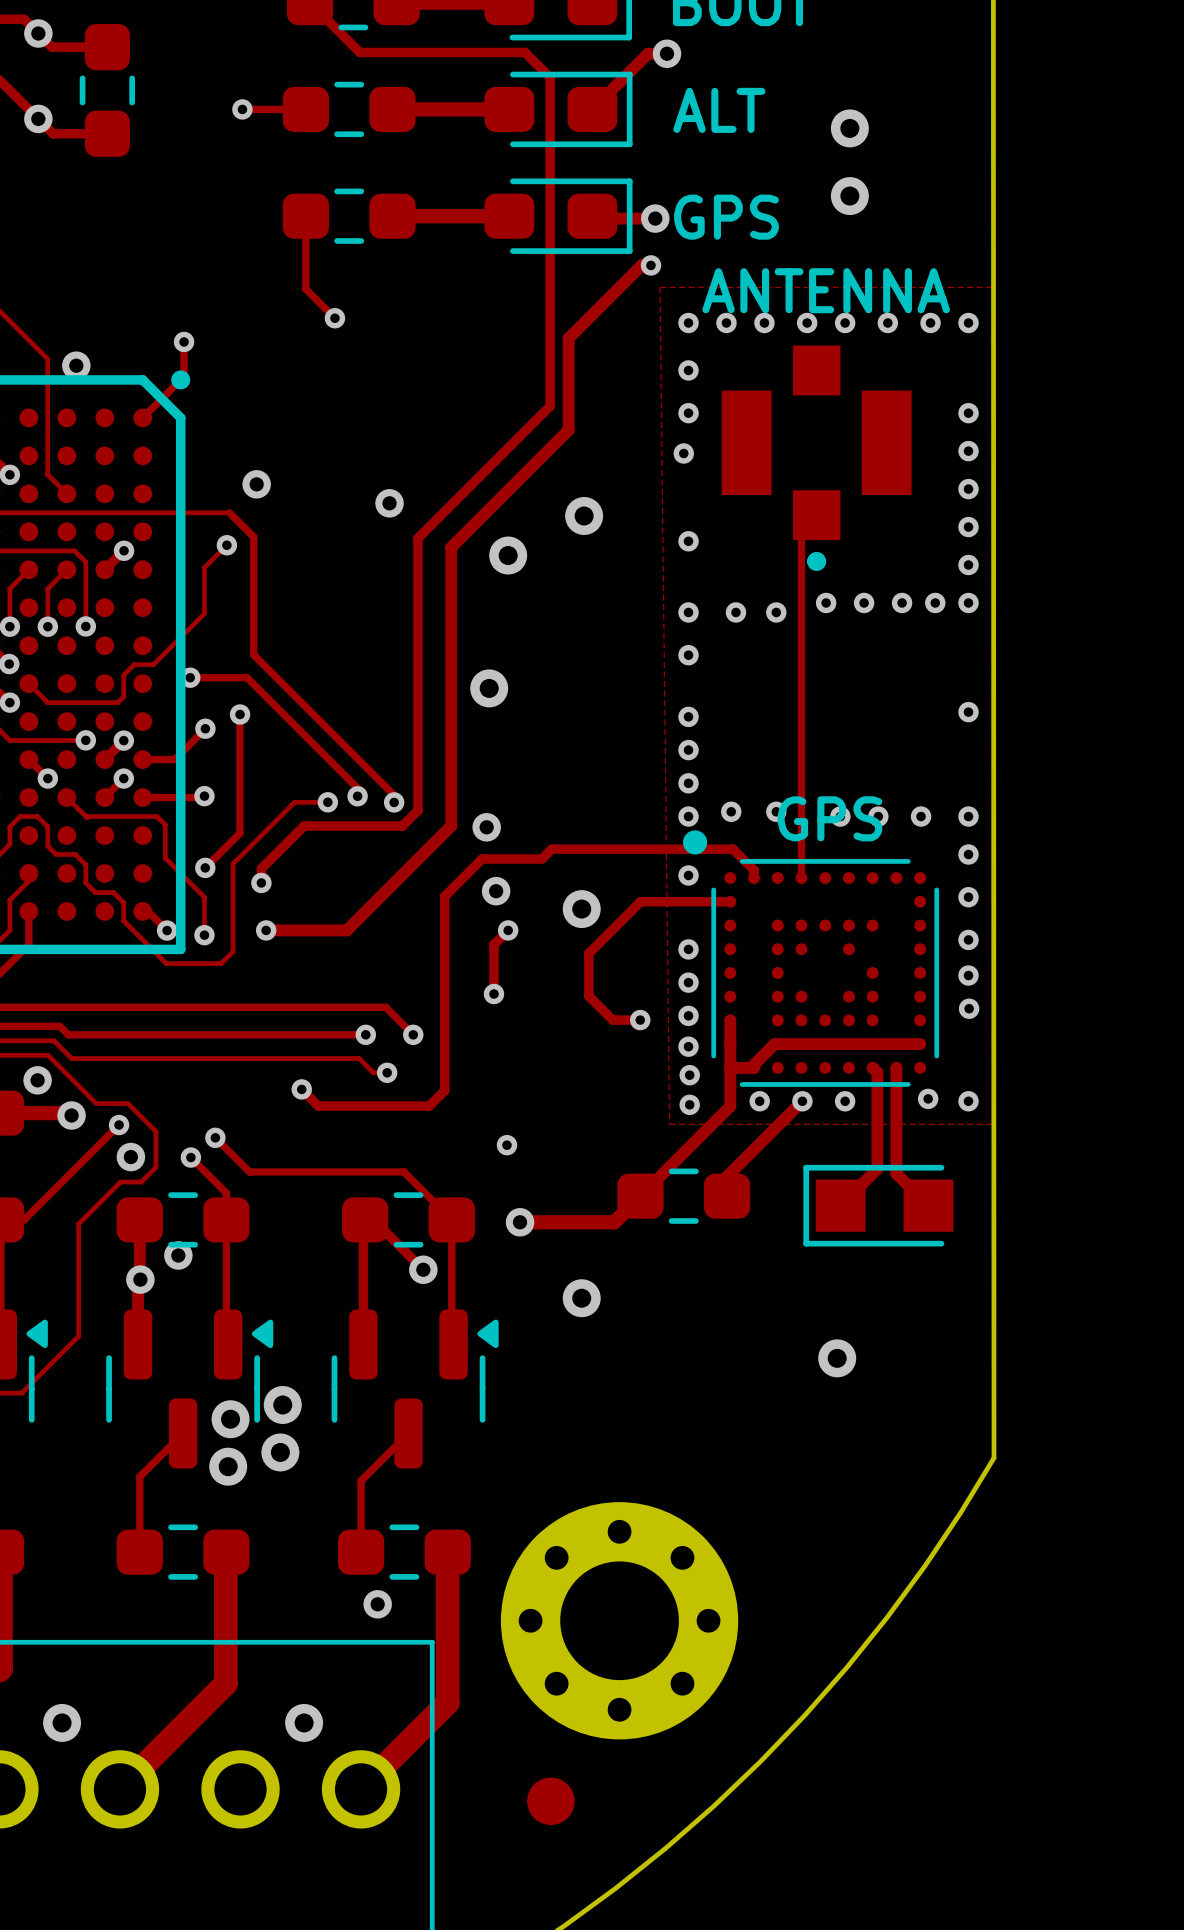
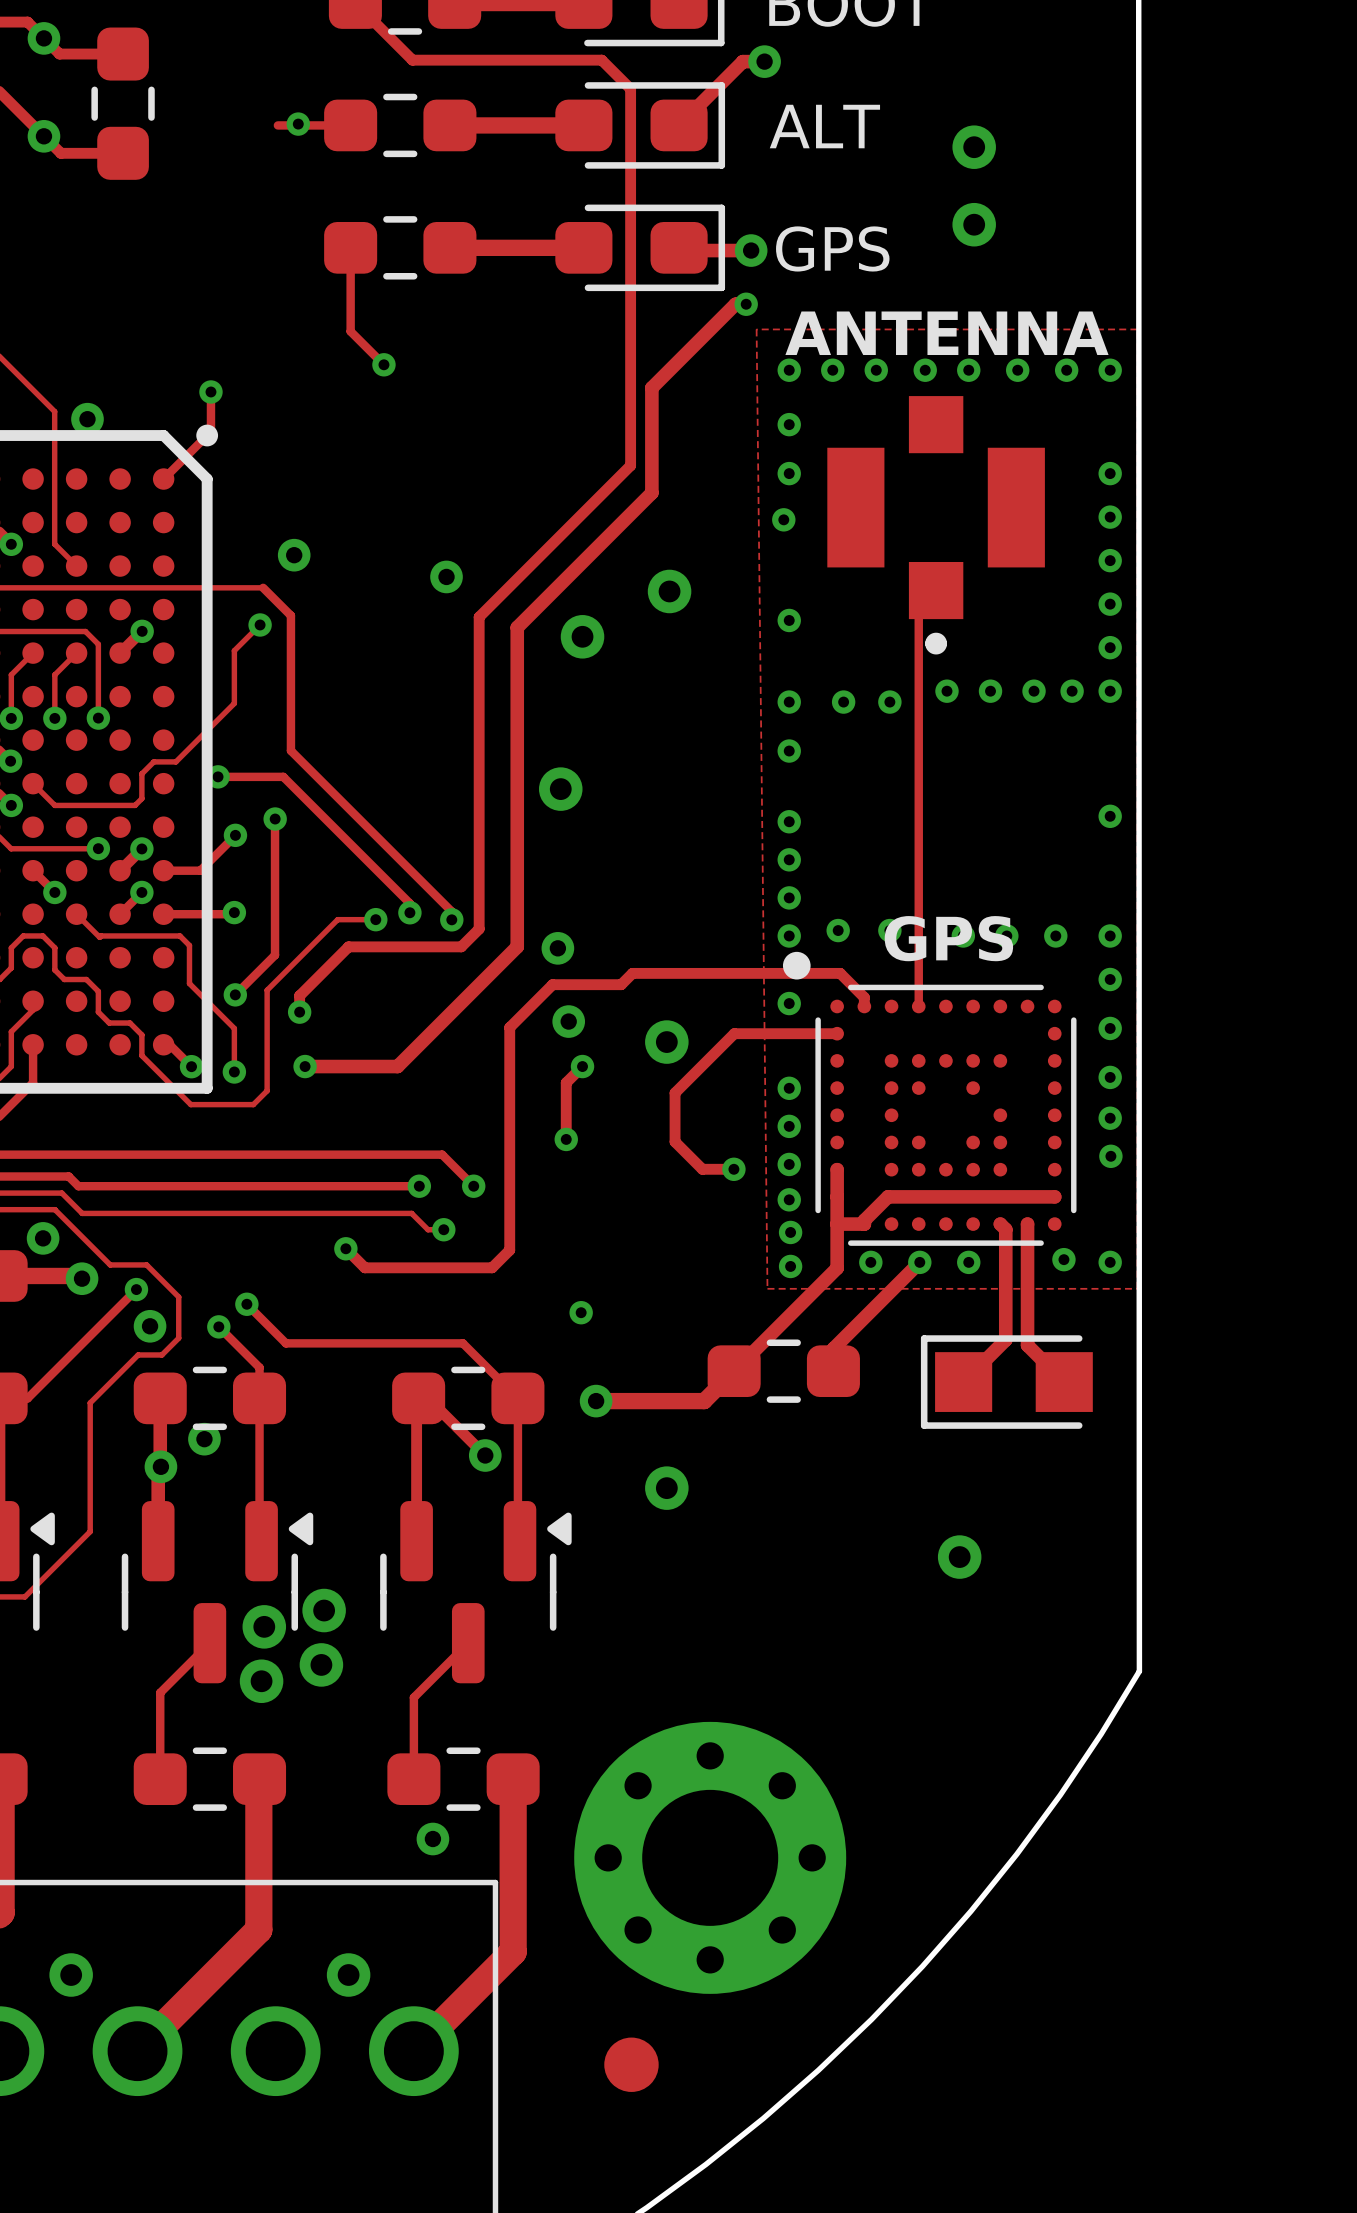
via position: (242, 109) -> (298, 124)

